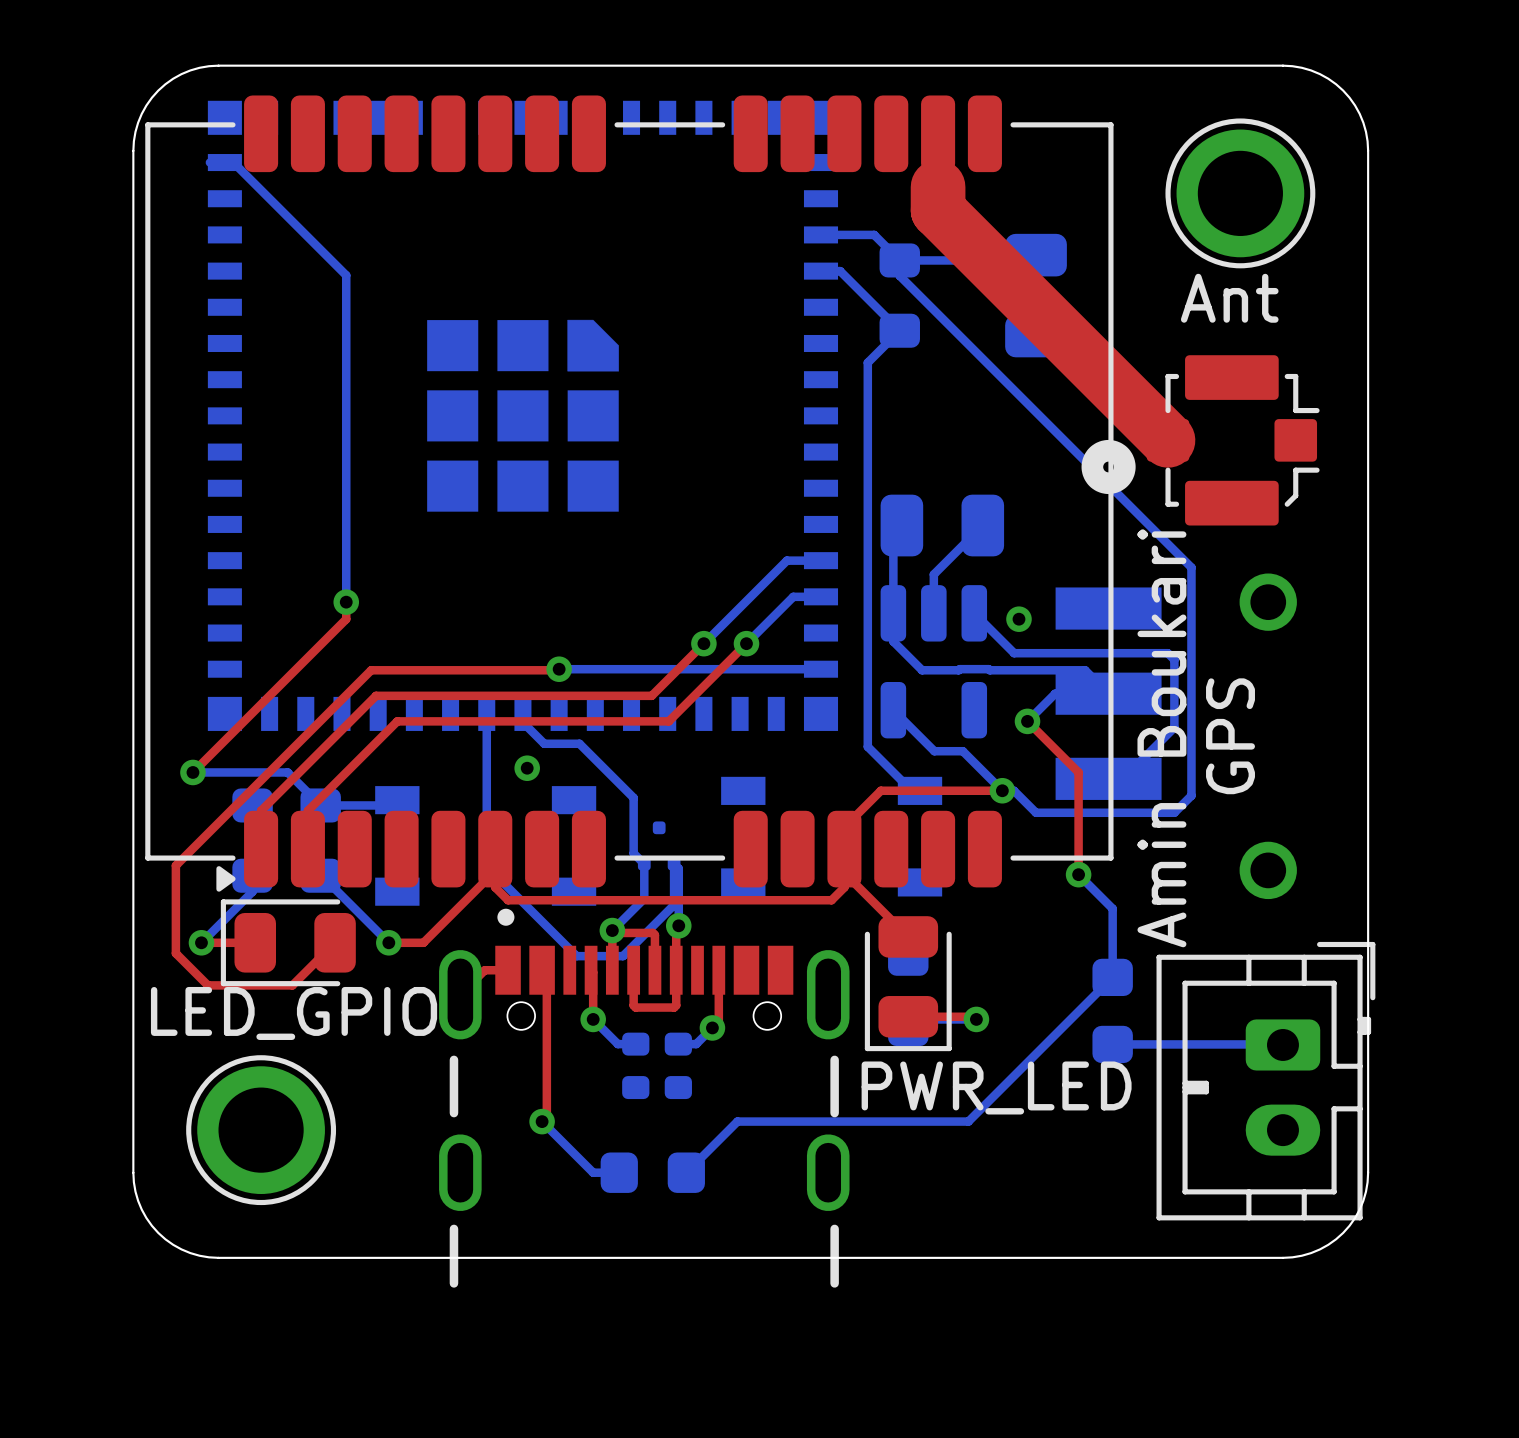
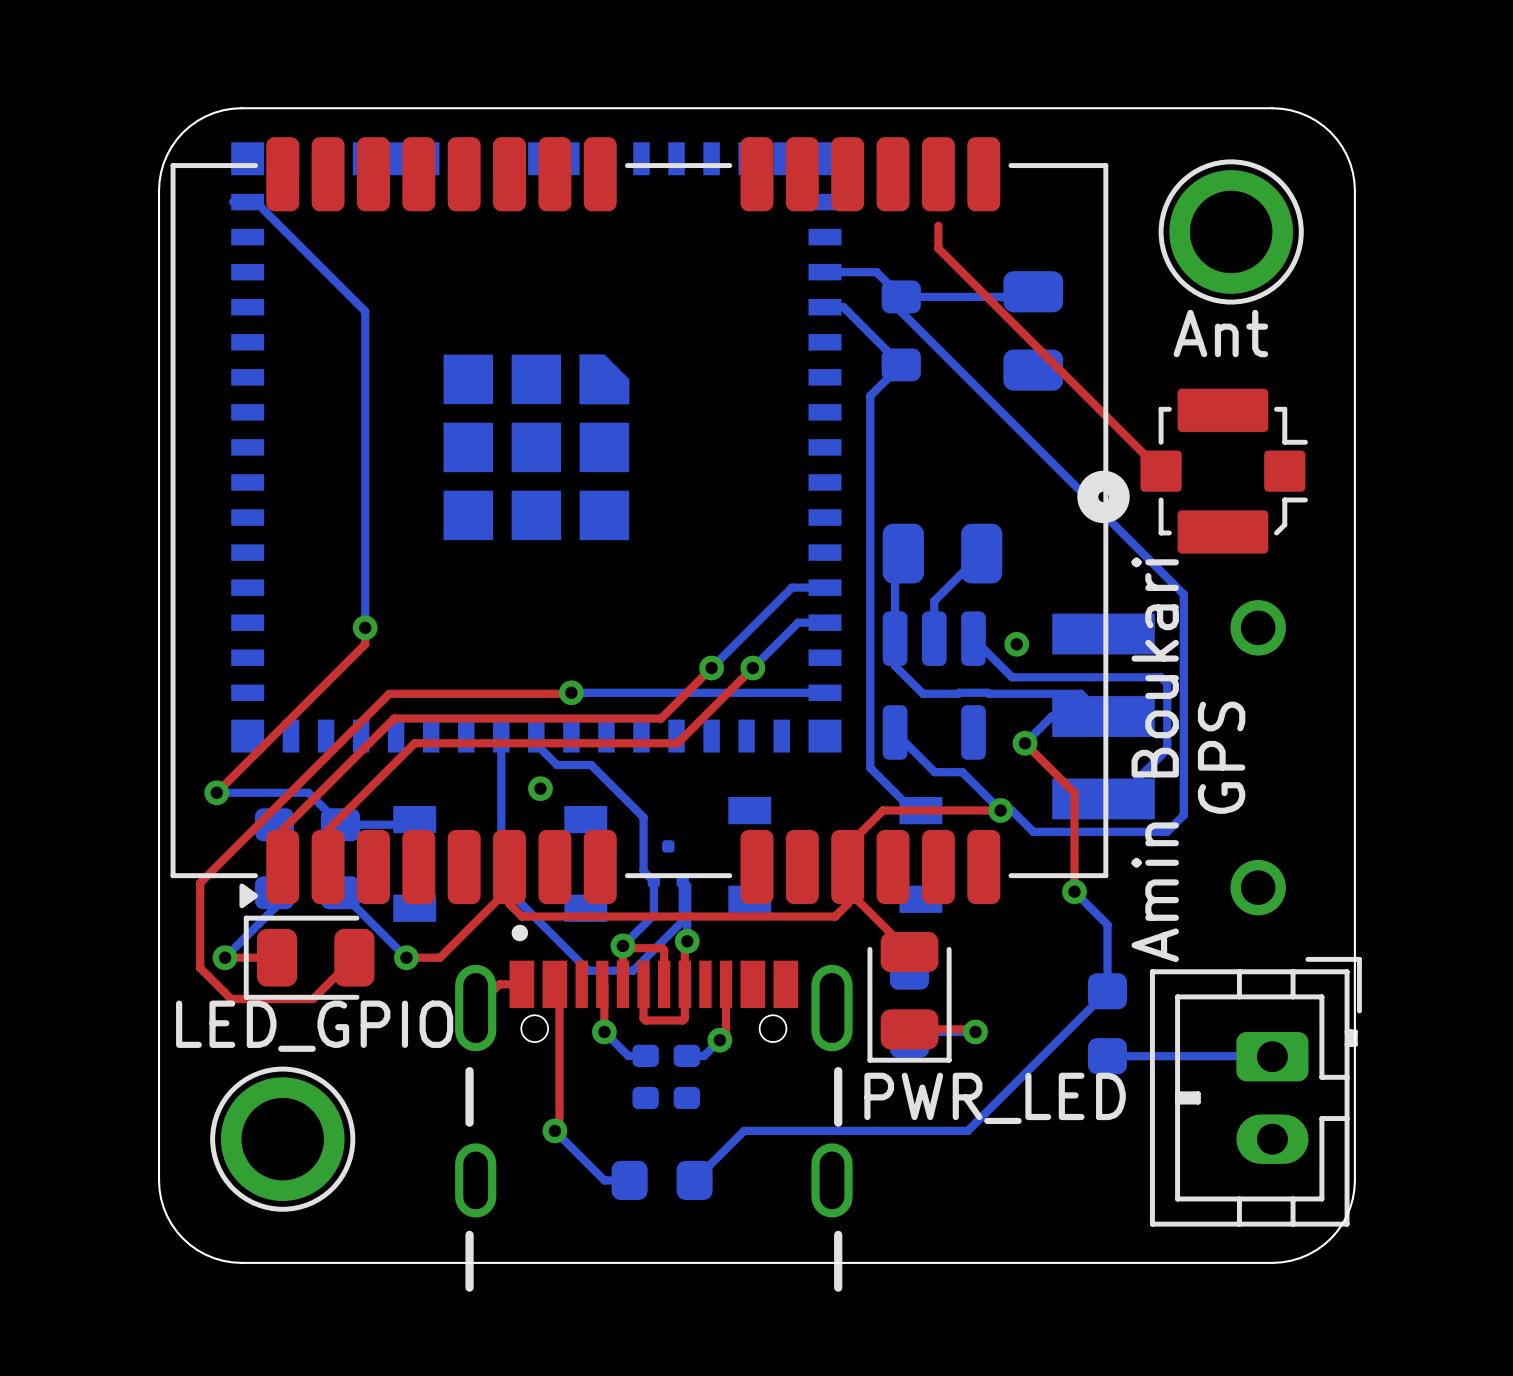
top track width: thick (938, 187) (938, 210) (1168, 440) -> thin (938, 225) (938, 248) (1161, 471)

